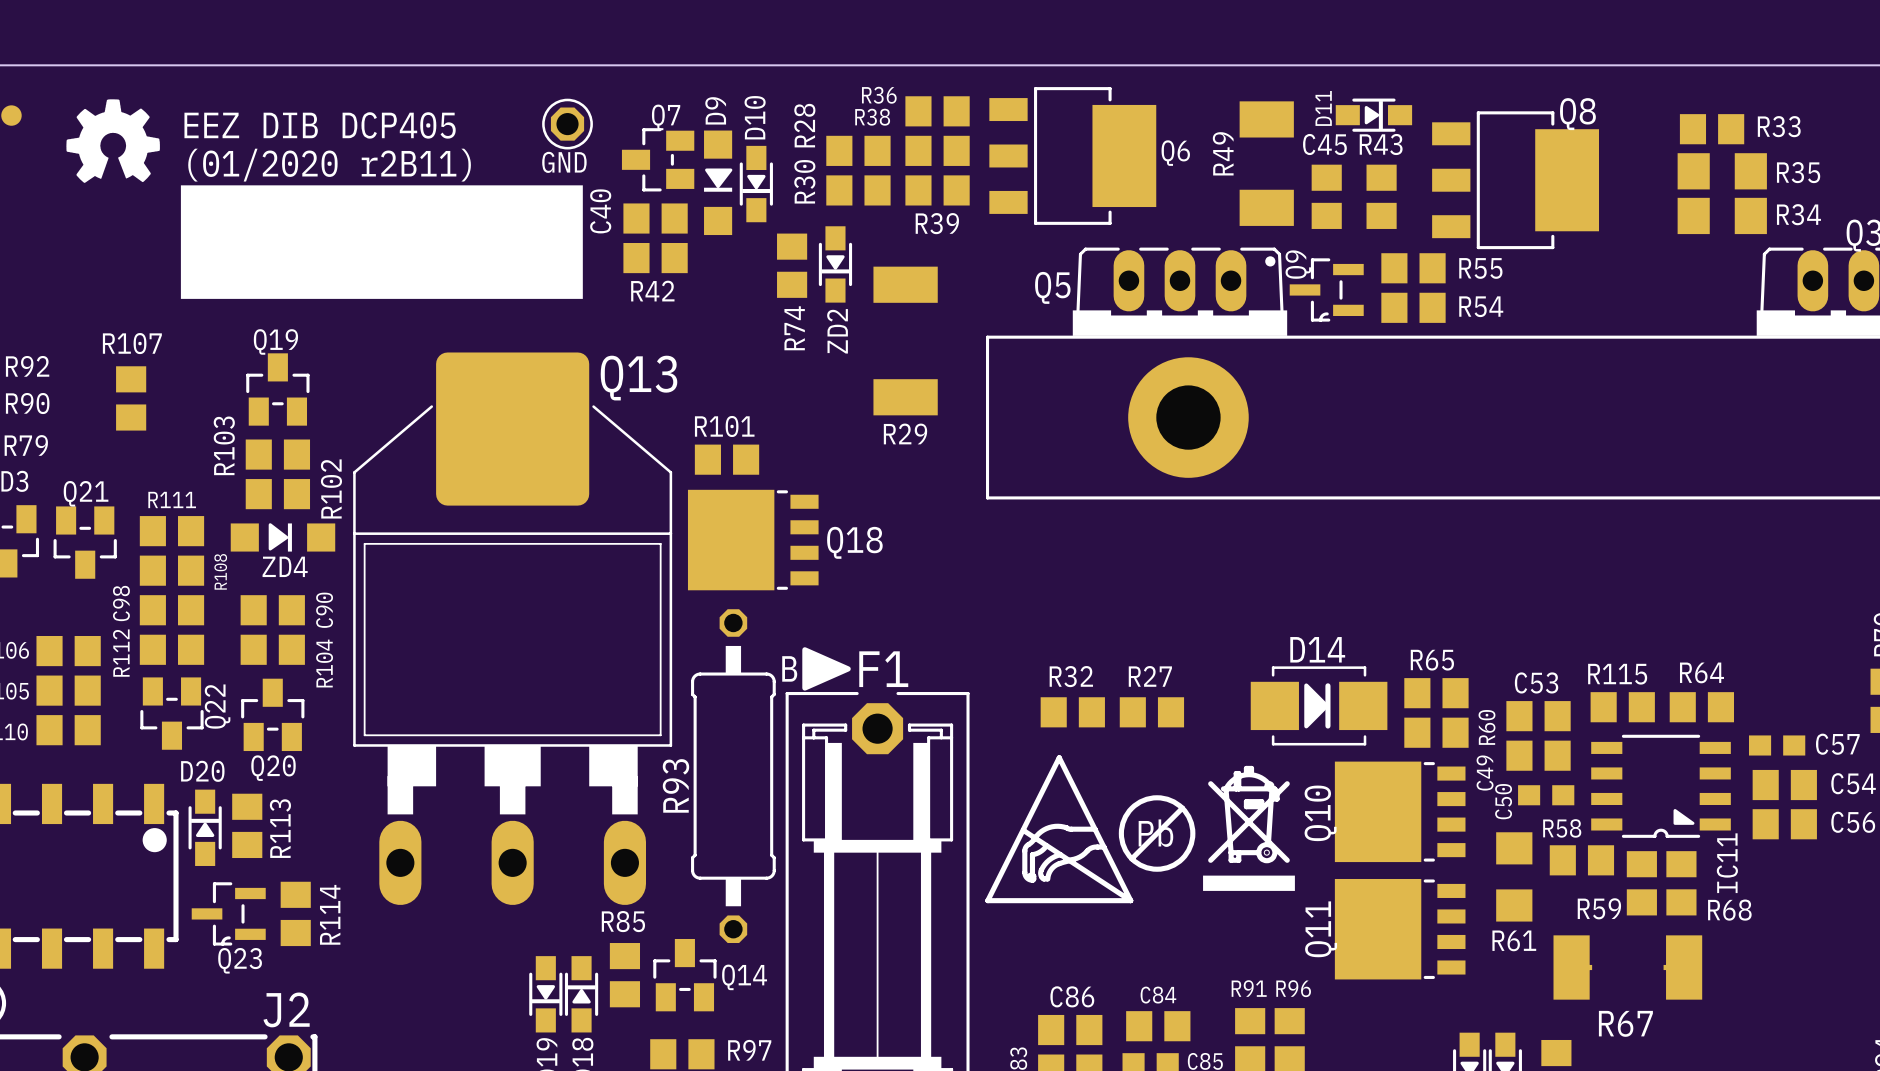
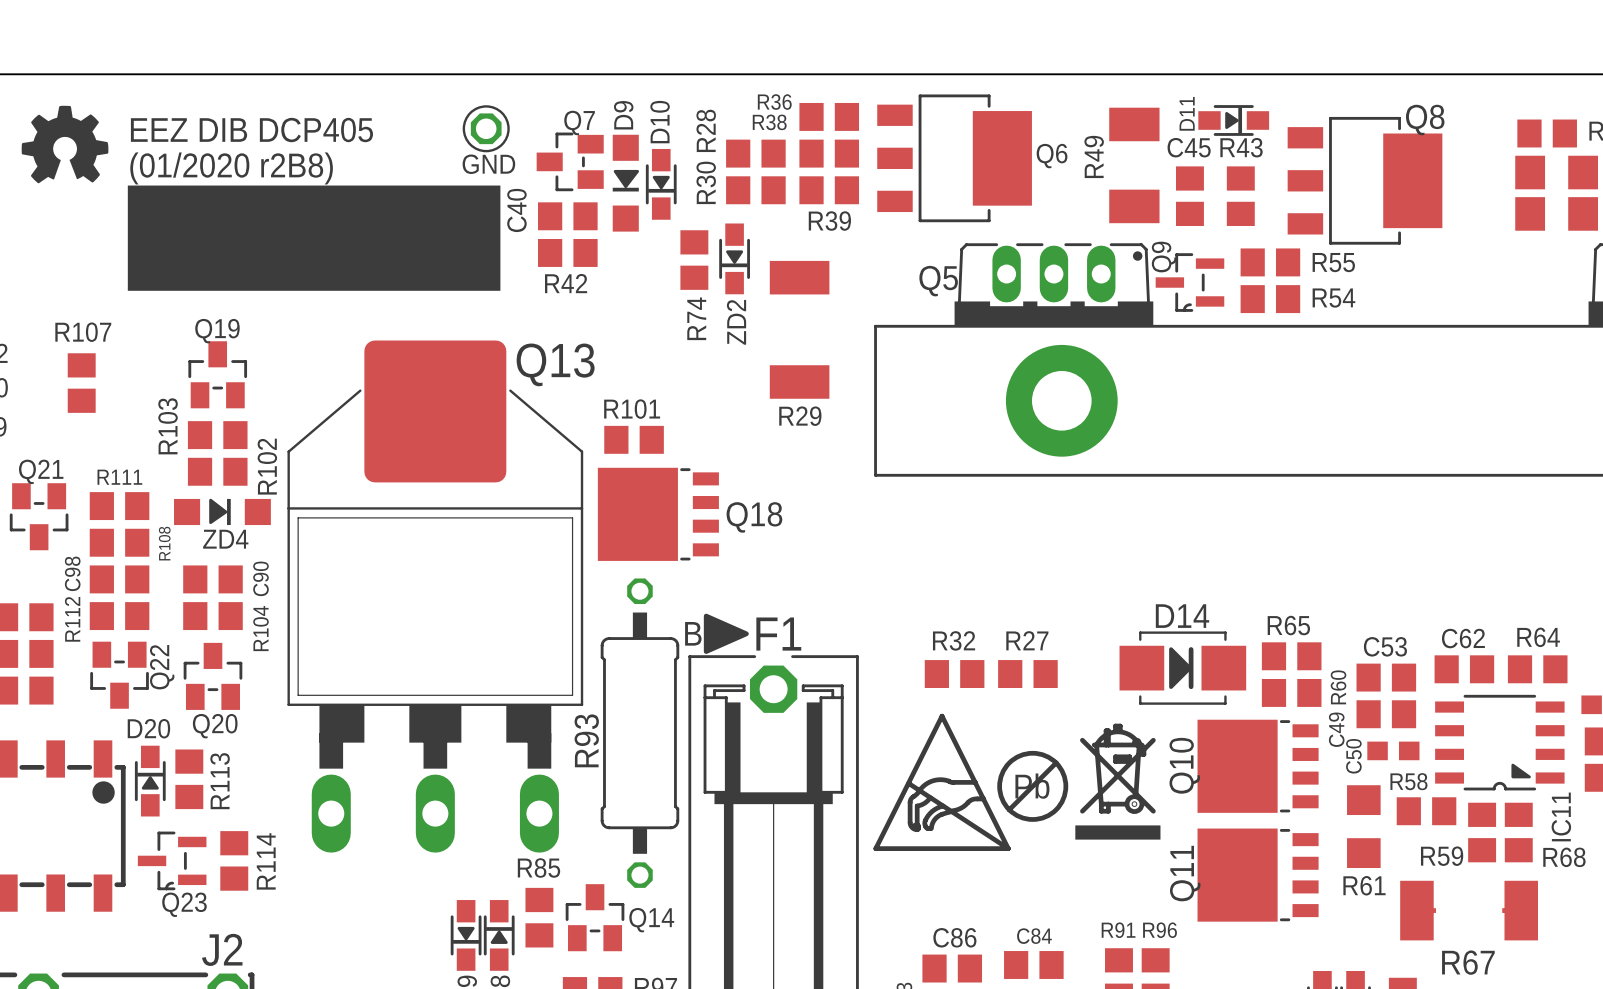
text: (01/2020 r2B11) (329, 165) -> (01/2020 r2B8) (231, 168)
R115 name: R115 (1617, 674) -> C62 (1463, 638)

